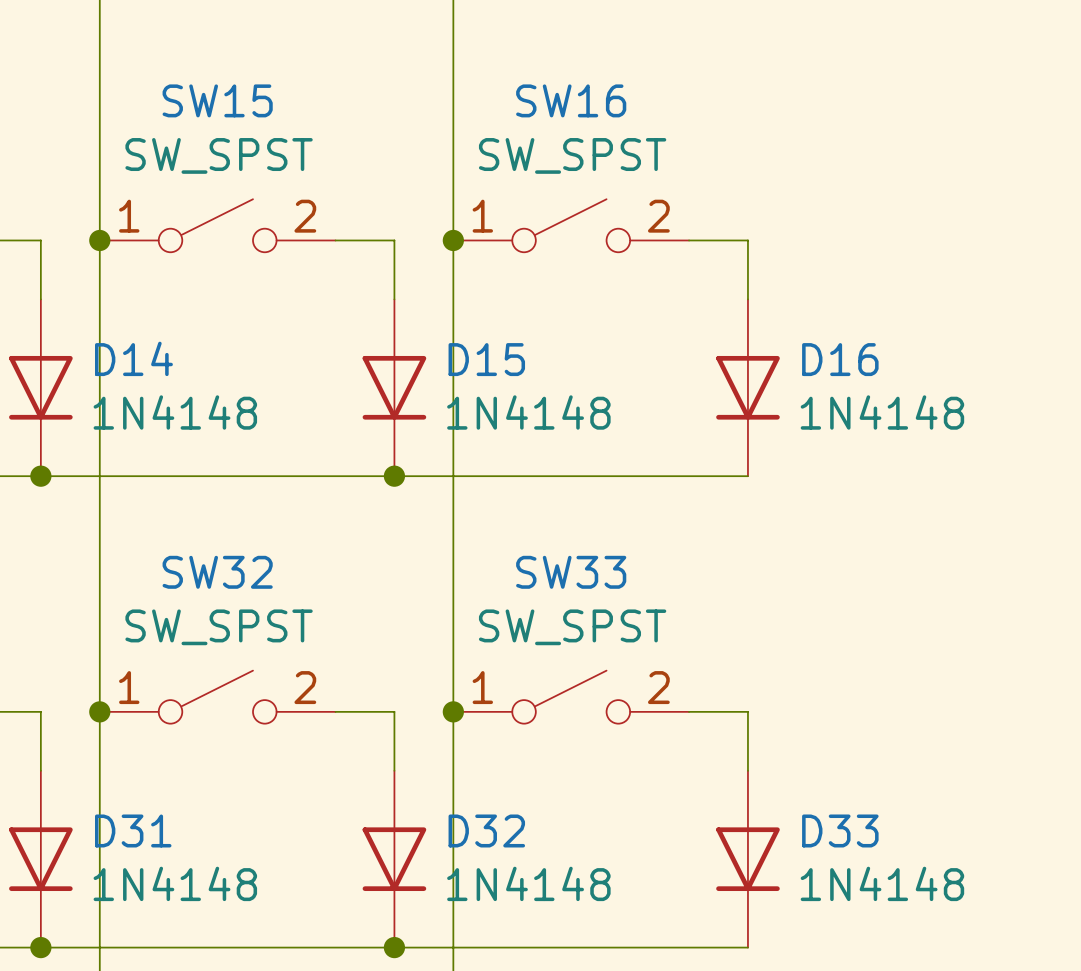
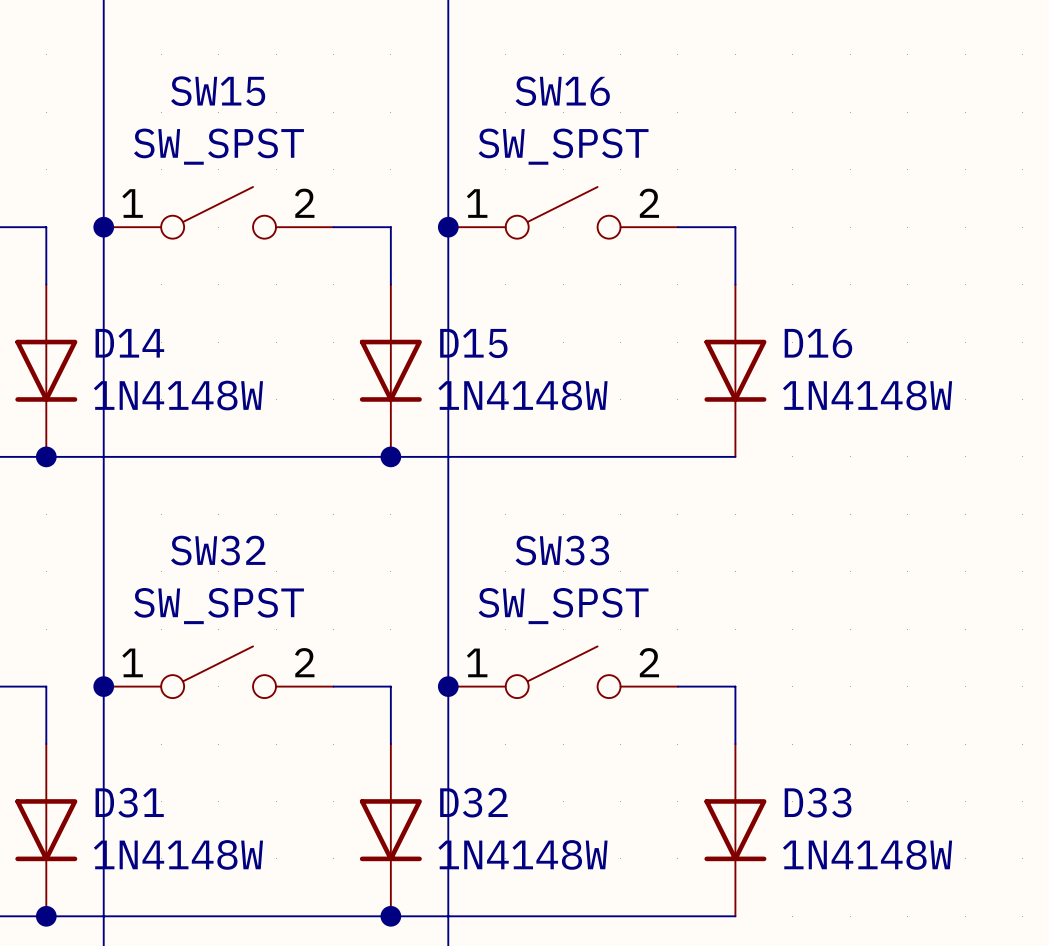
D14 value: 1N4148 (175, 412) -> 1N4148W (178, 395)
D15 value: 1N4148 (528, 412) -> 1N4148W (522, 395)
D16 value: 1N4148 (882, 412) -> 1N4148W (867, 395)
D31 value: 1N4148 (175, 883) -> 1N4148W (178, 854)
D32 value: 1N4148 (528, 883) -> 1N4148W (522, 854)
D33 value: 1N4148 (882, 883) -> 1N4148W (867, 854)

